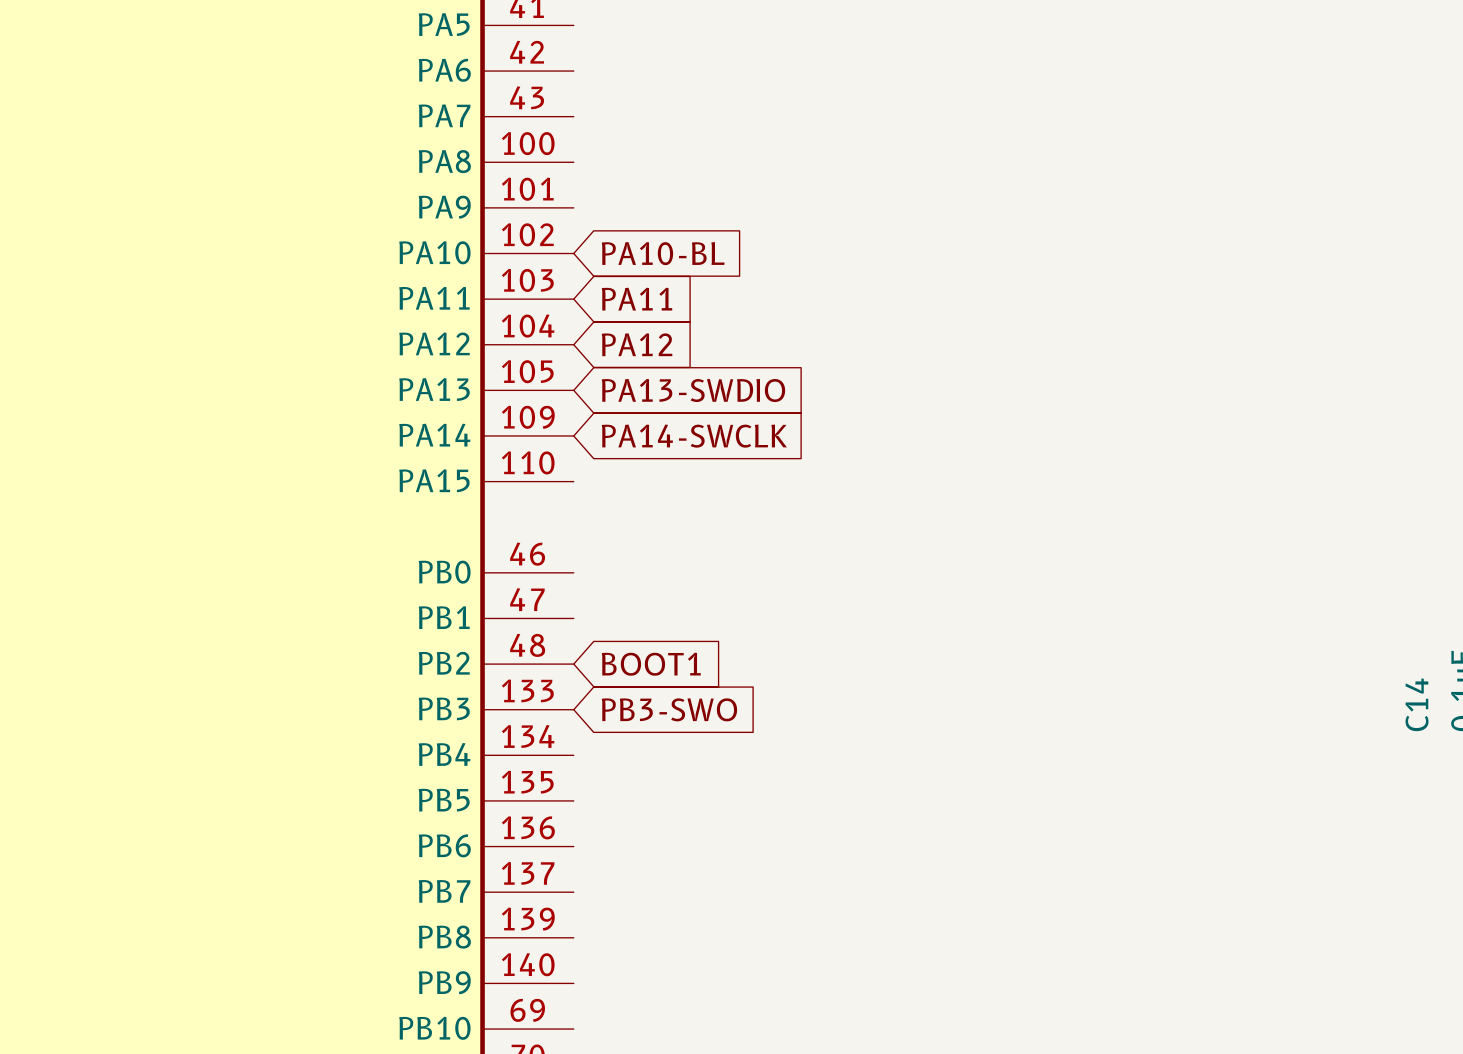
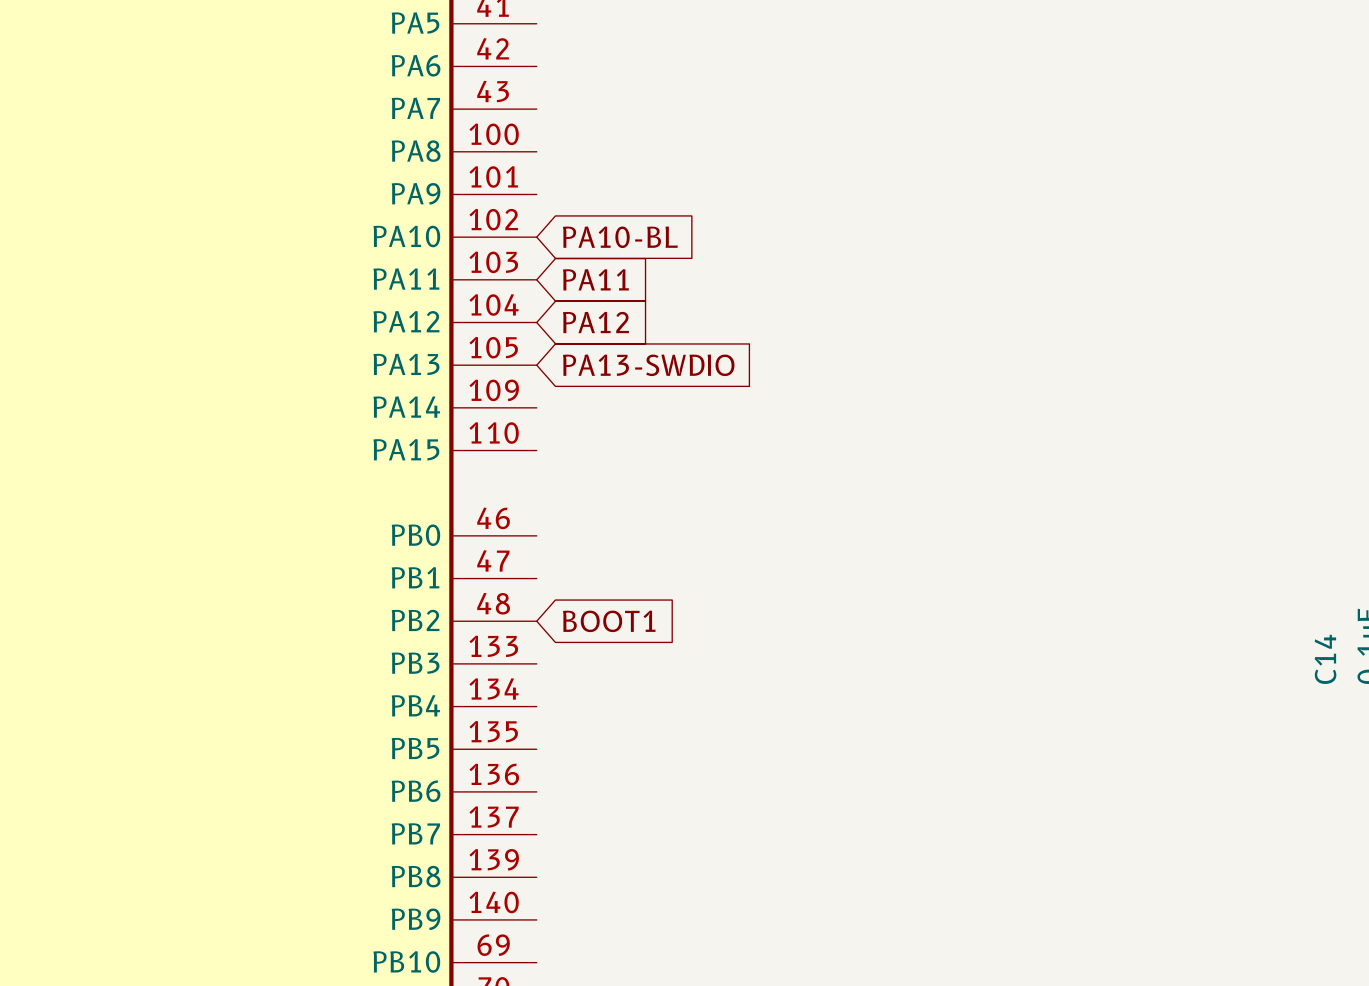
global label: PA14-SWCLK (694, 436) -> none
global label: PB3-SWO (669, 709) -> none

